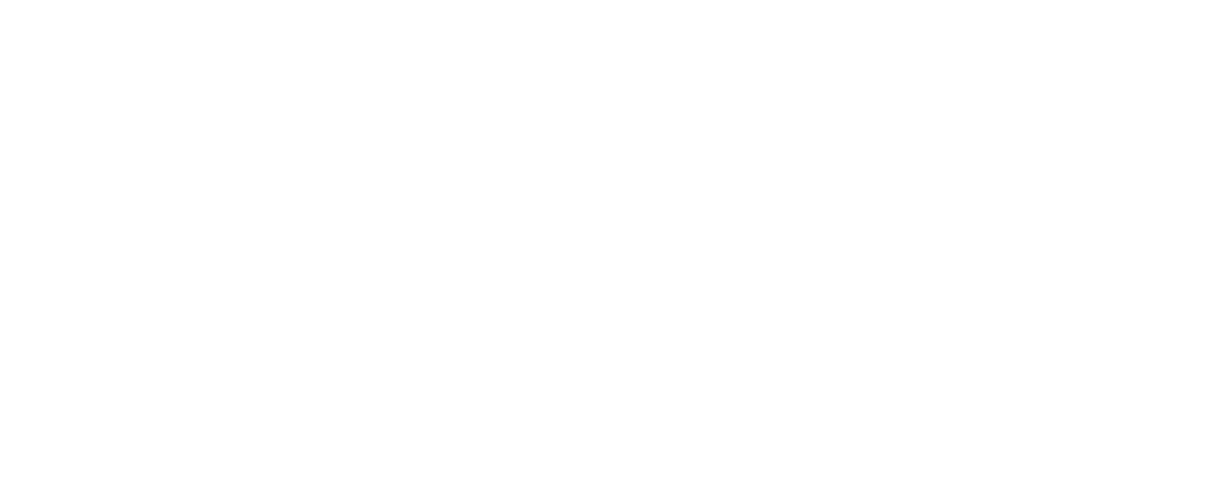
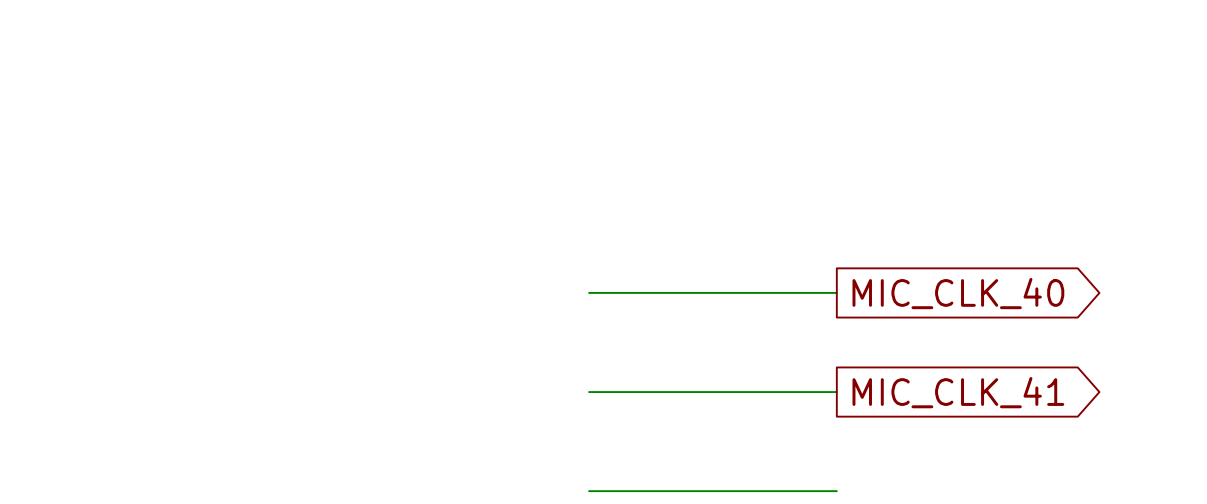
wire: none -> (589, 292) (836, 292)
global label: none -> MIC_CLK_40 (958, 293)
wire: none -> (589, 392) (836, 392)
global label: none -> MIC_CLK_41 (958, 392)
wire: none -> (589, 491) (836, 491)

